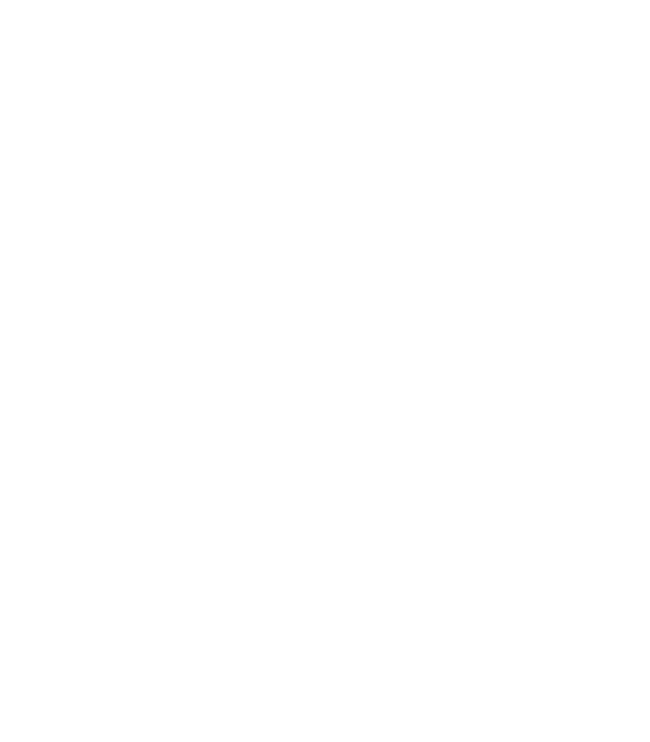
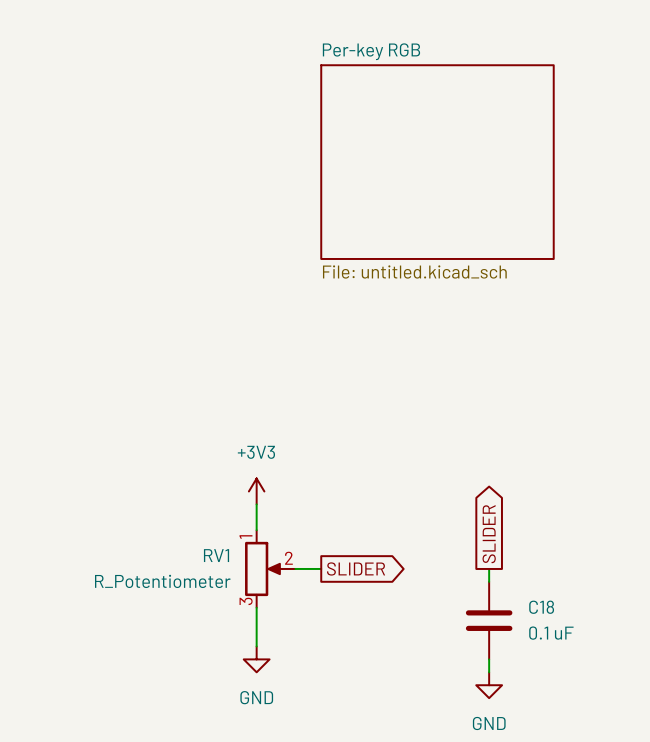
sheet Per-key RGB: none -> File: untitled.kicad_sch (437, 162)
power symbol: none -> +3V3 (256, 491)
wire: none -> (256, 504) (256, 530)
global label: none -> SLIDER (489, 534)
RV1: none -> R_Potentiometer (270, 568)
wire: none -> (295, 568) (321, 568)
global label: none -> SLIDER (356, 568)
wire: none -> (489, 568) (489, 581)
wire: none -> (256, 607) (256, 646)
C18: none -> 0.1 uF (489, 620)
power symbol: none -> GND (256, 659)
wire: none -> (489, 659) (489, 672)
power symbol: none -> GND (489, 685)

